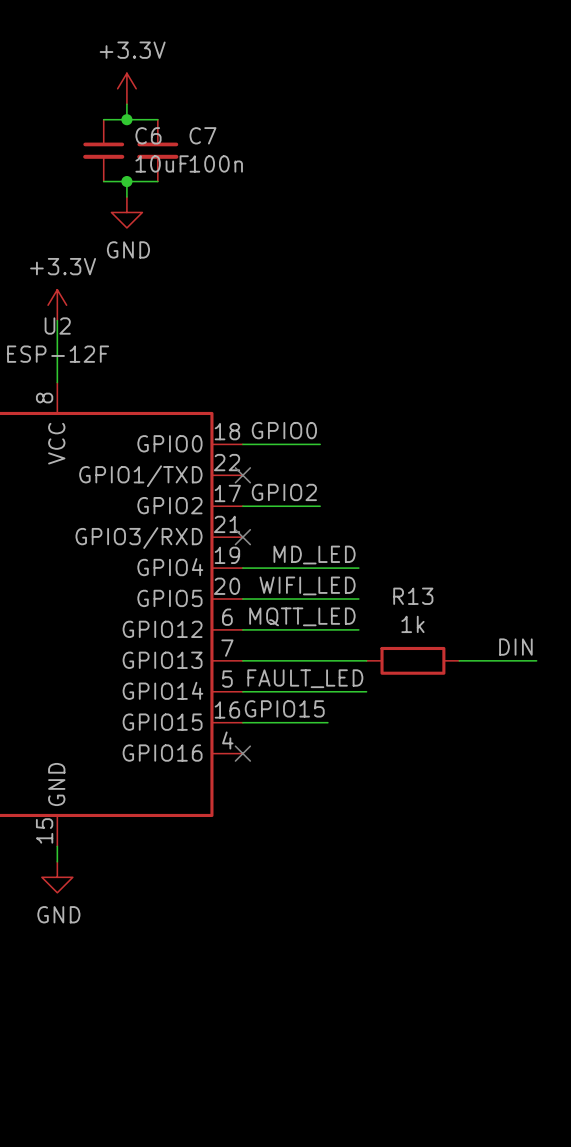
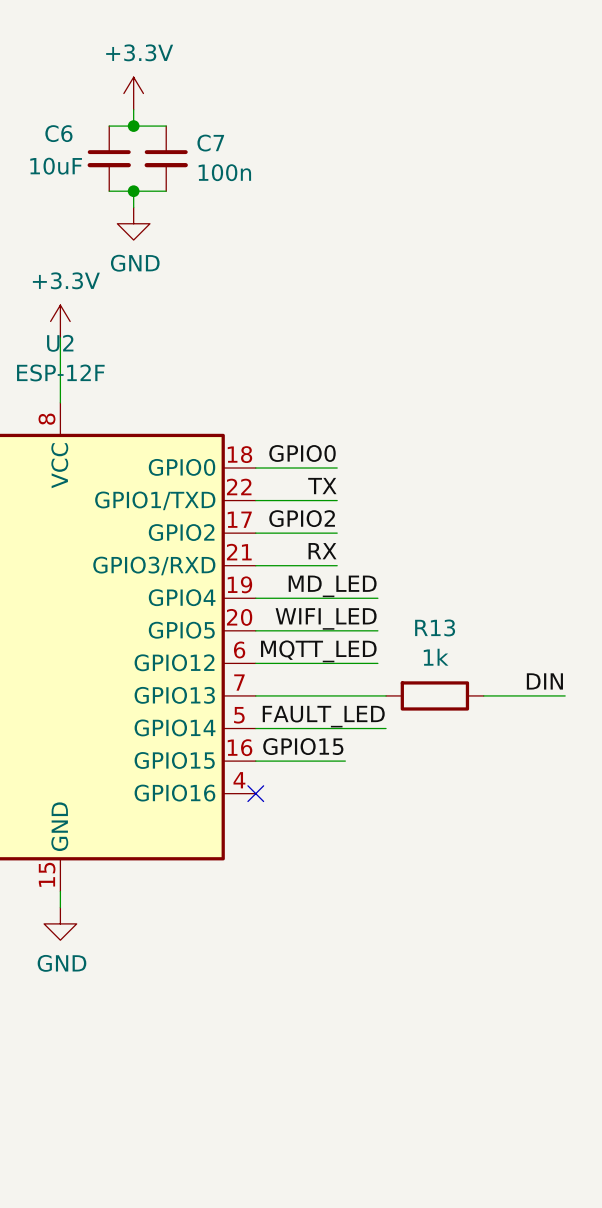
C6 name position: C6 (148, 135) -> C6 (58, 133)
C6 value position: 10uF (162, 163) -> 10uF (56, 166)
label: none -> TX (322, 486)
wire: none -> (255, 500) (337, 500)
no-connect mark: (242, 475) -> none
label: none -> RX (322, 551)
wire: none -> (255, 565) (337, 565)
no-connect mark: (242, 537) -> none

